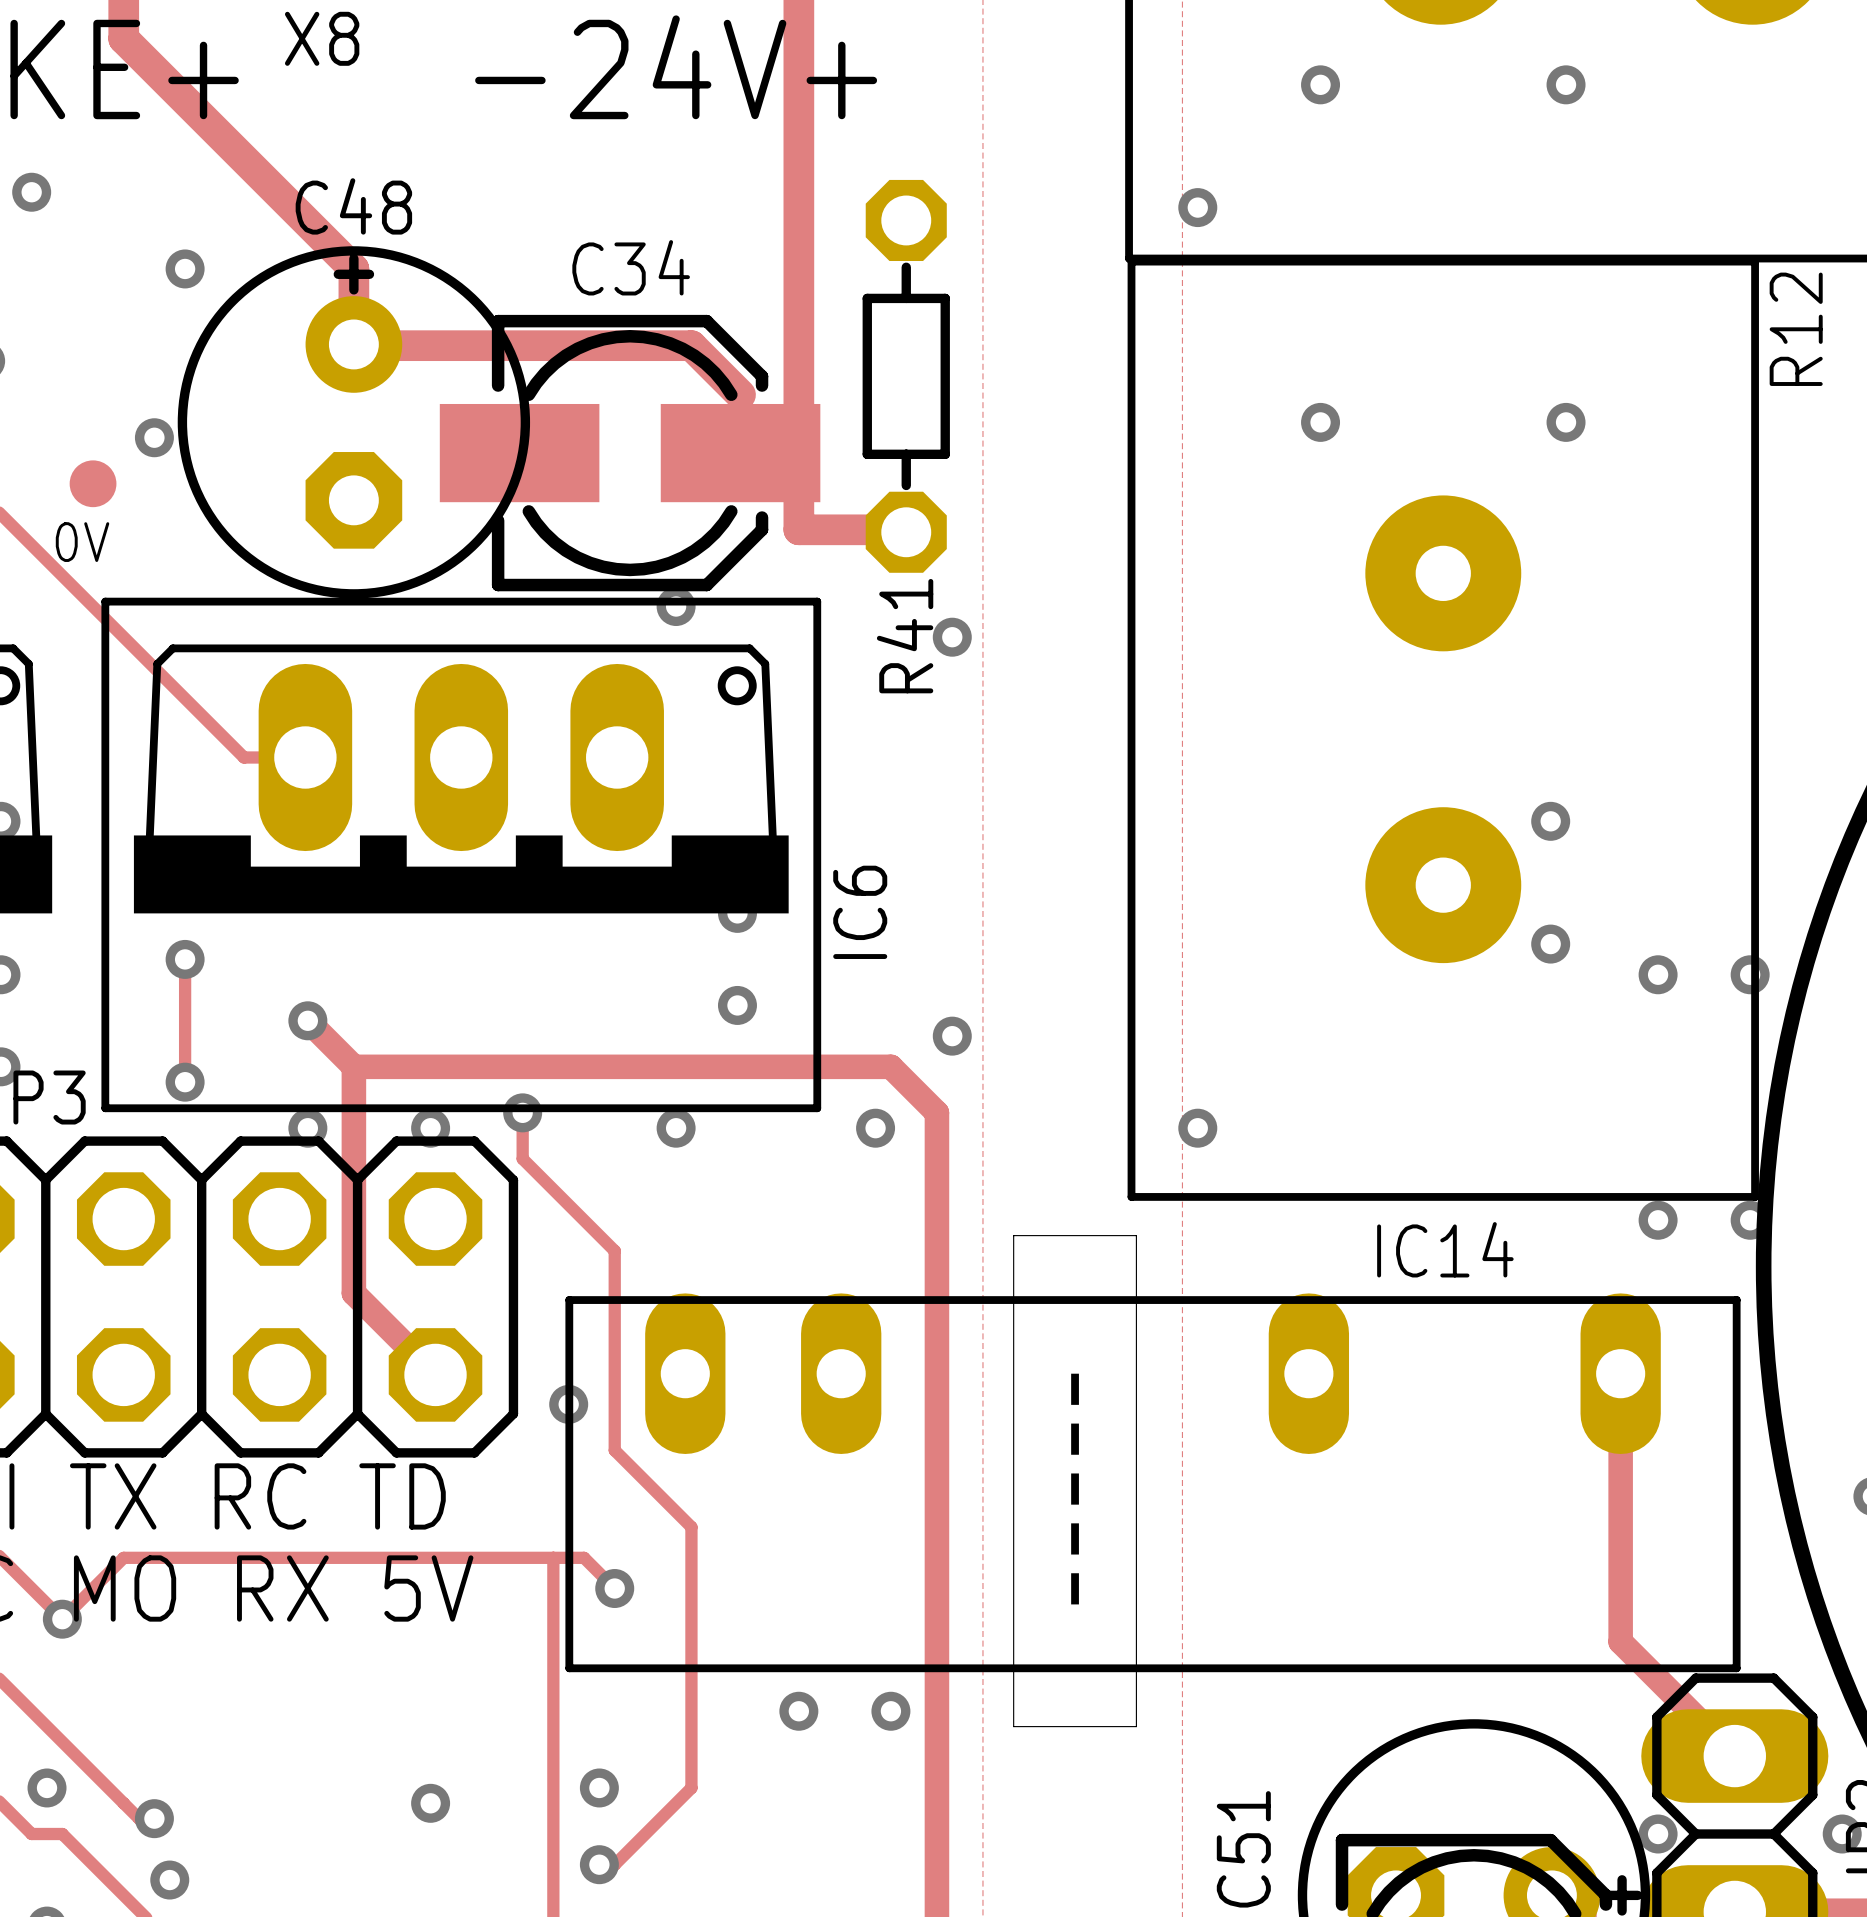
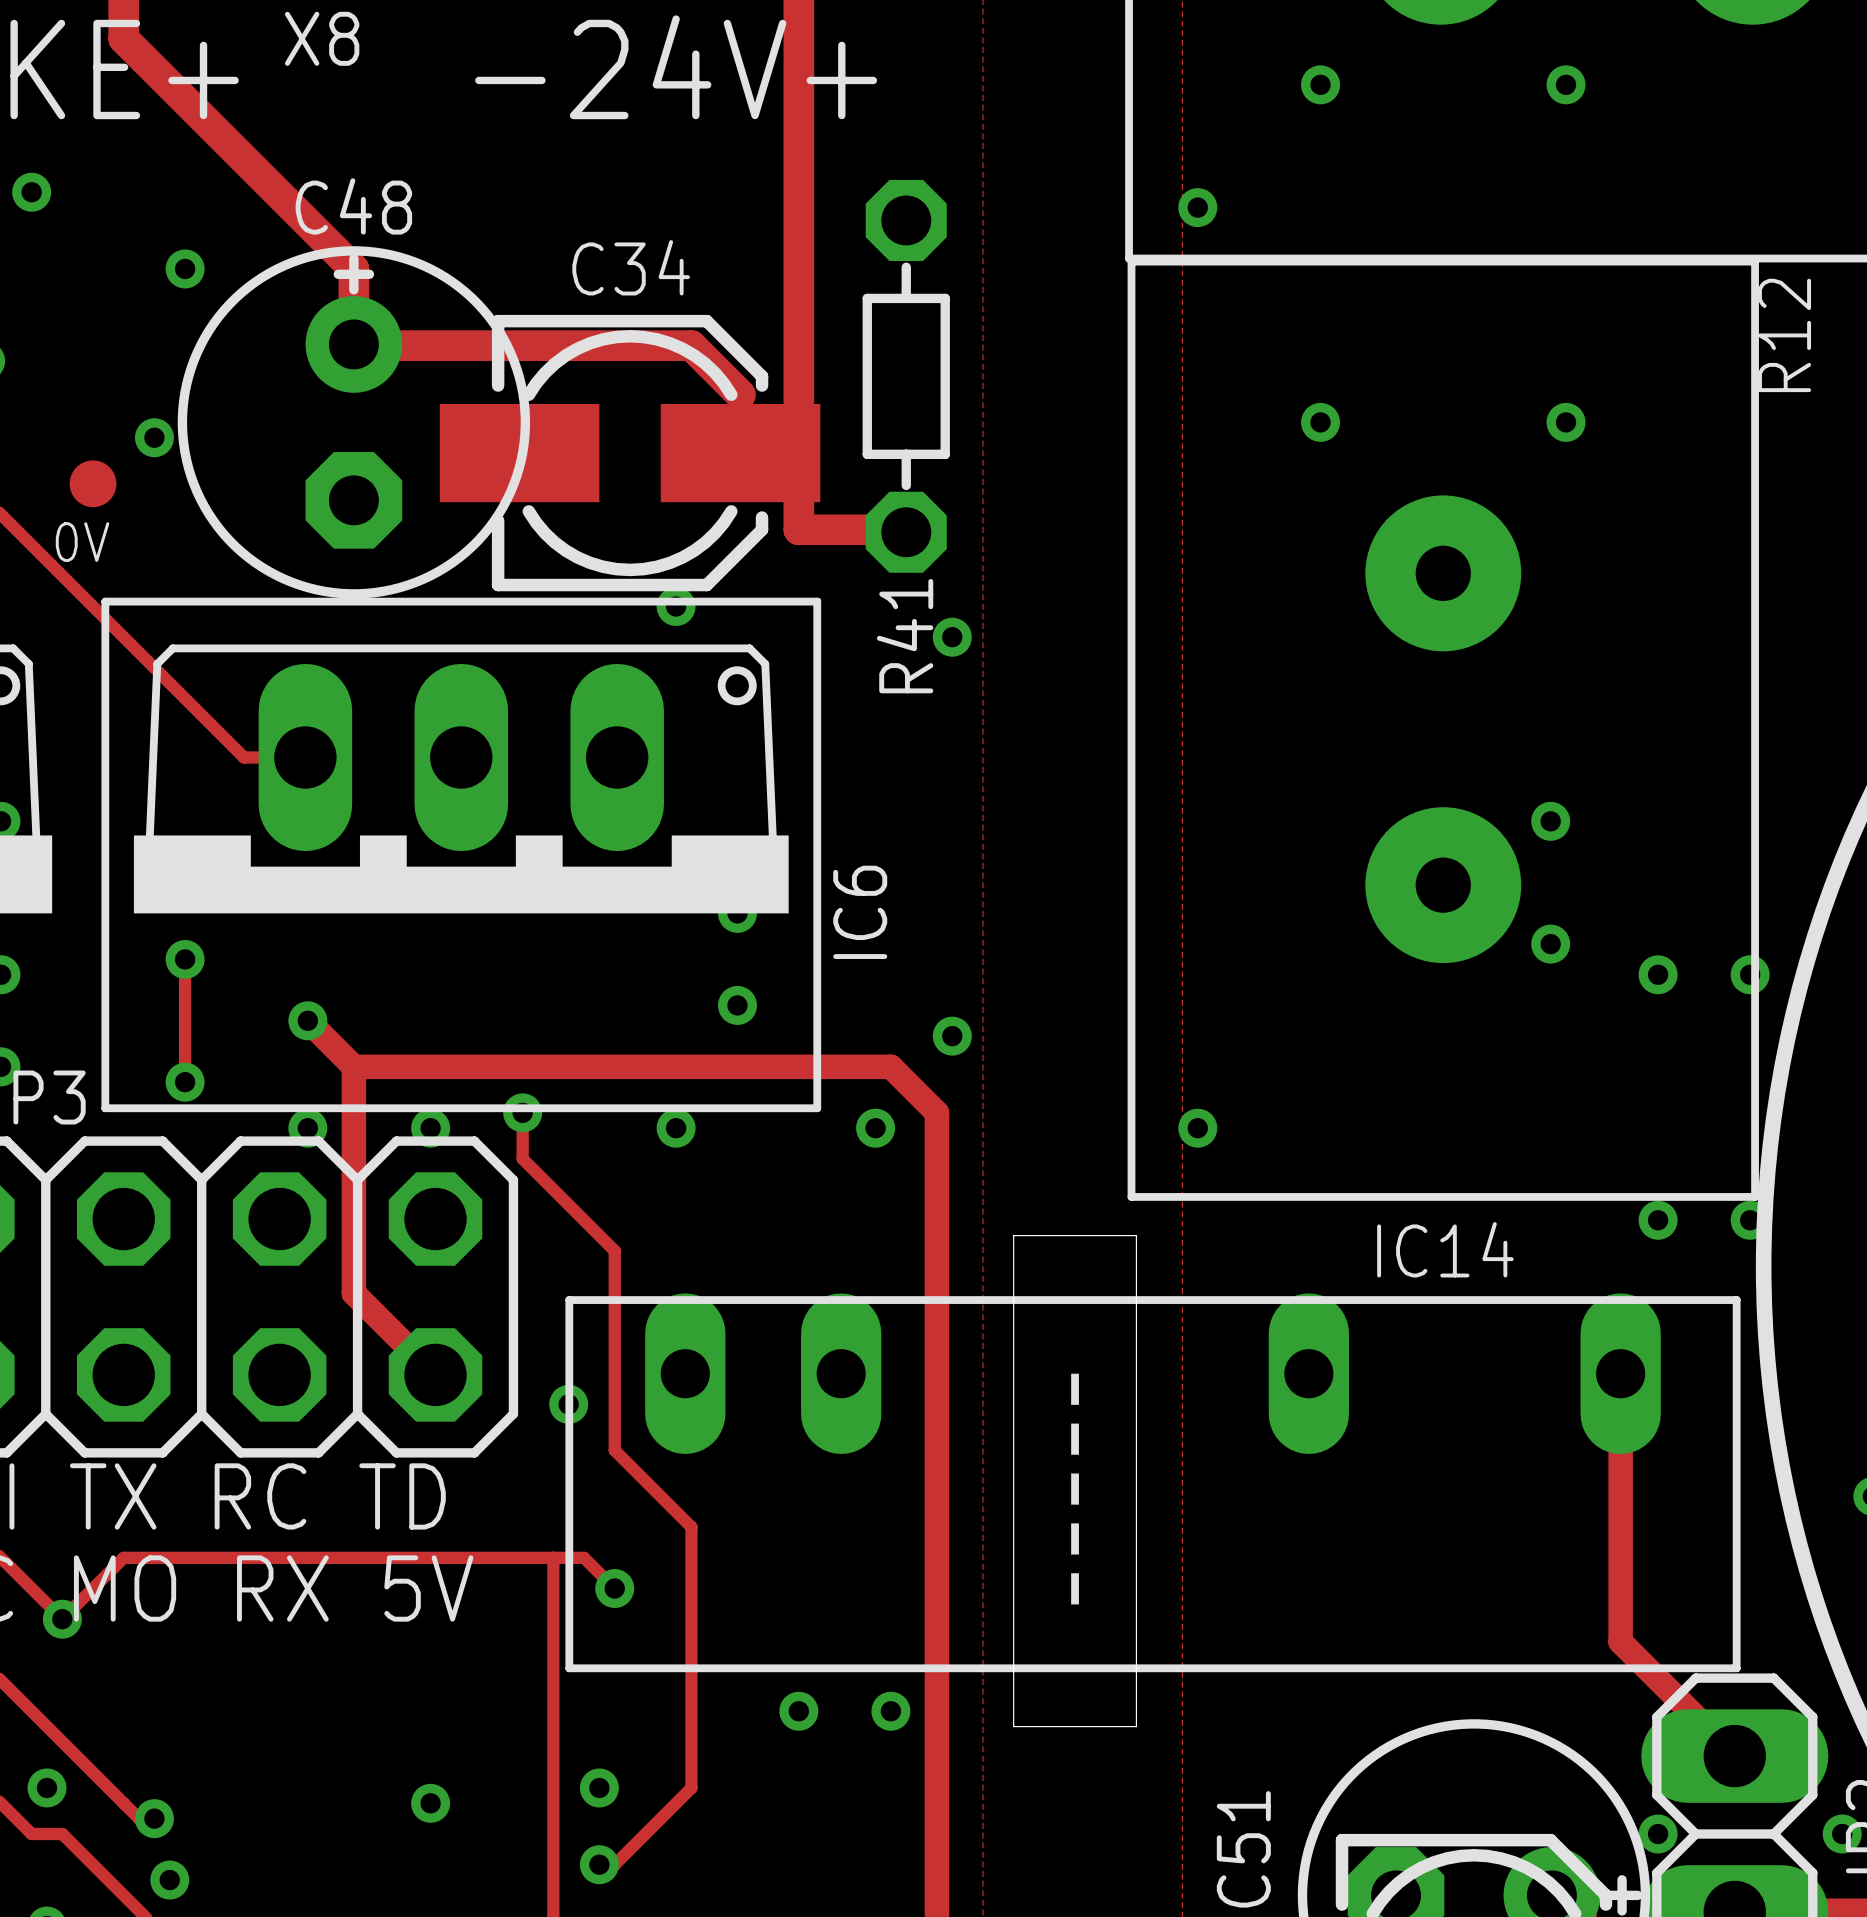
R12 name position: R12 (1796, 329) -> R12 (1784, 335)

